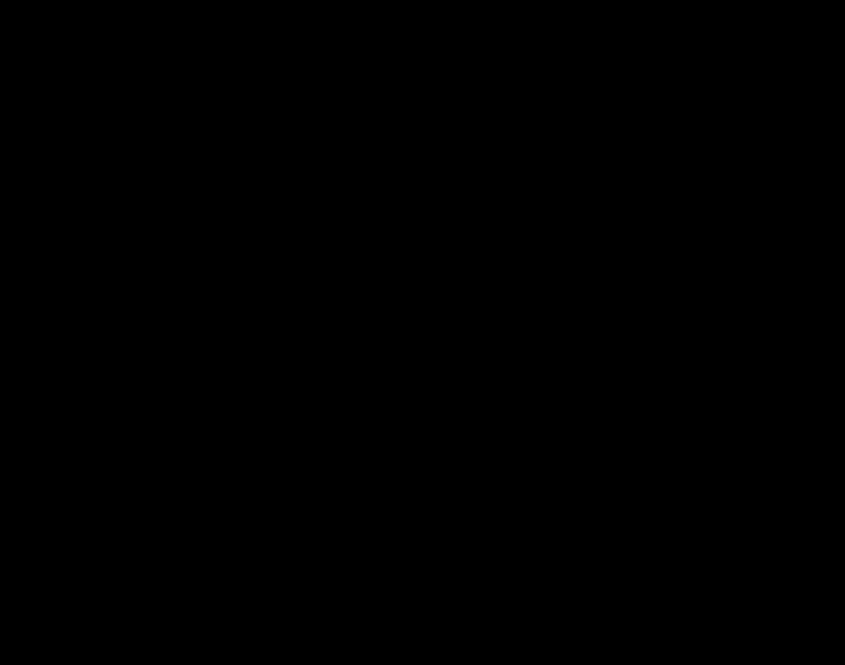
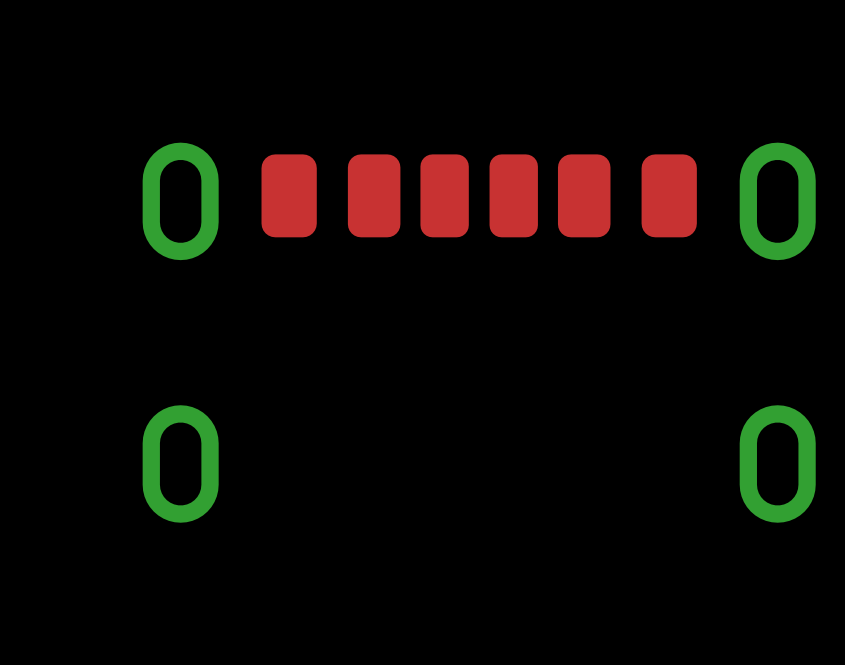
part: none -> (479, 332)

